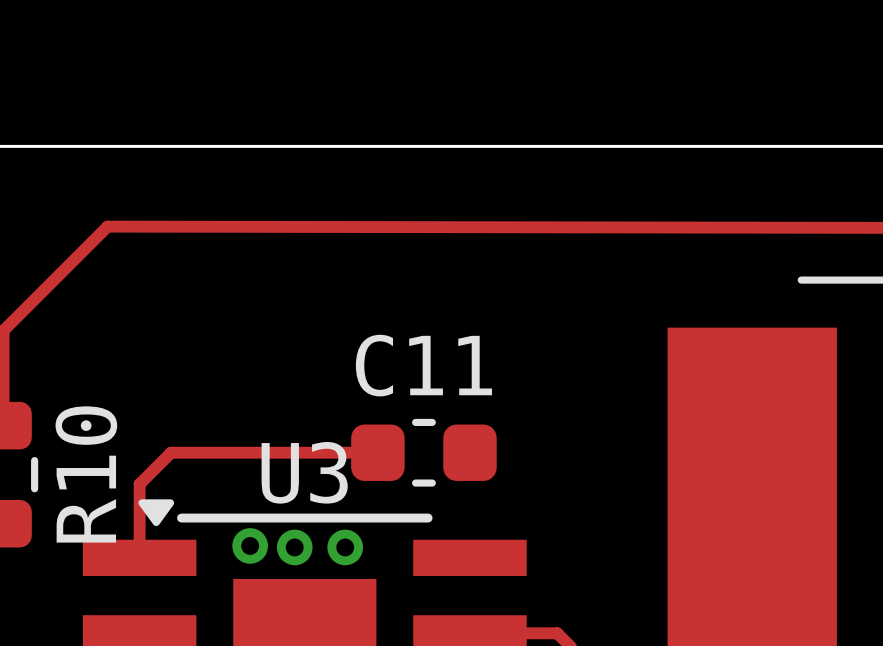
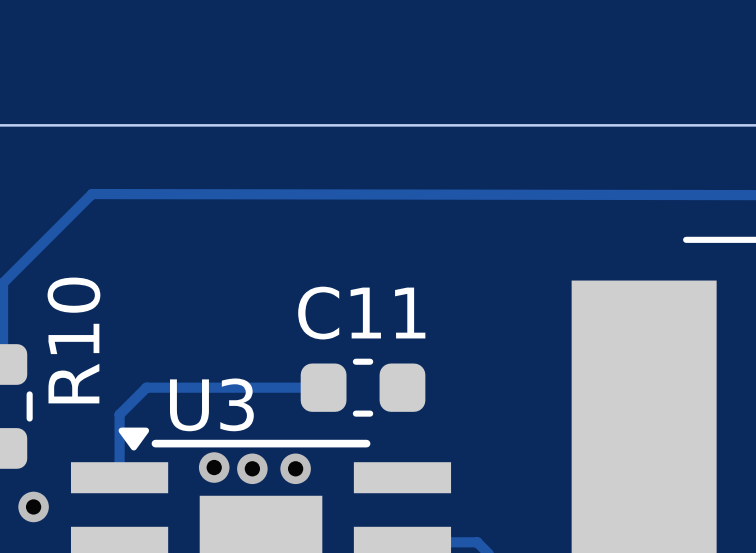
U3 name position: U3 (304, 472) -> U3 (211, 404)
R10 name position: R10 (86, 474) -> R10 (73, 340)
via: none -> (33, 506)

